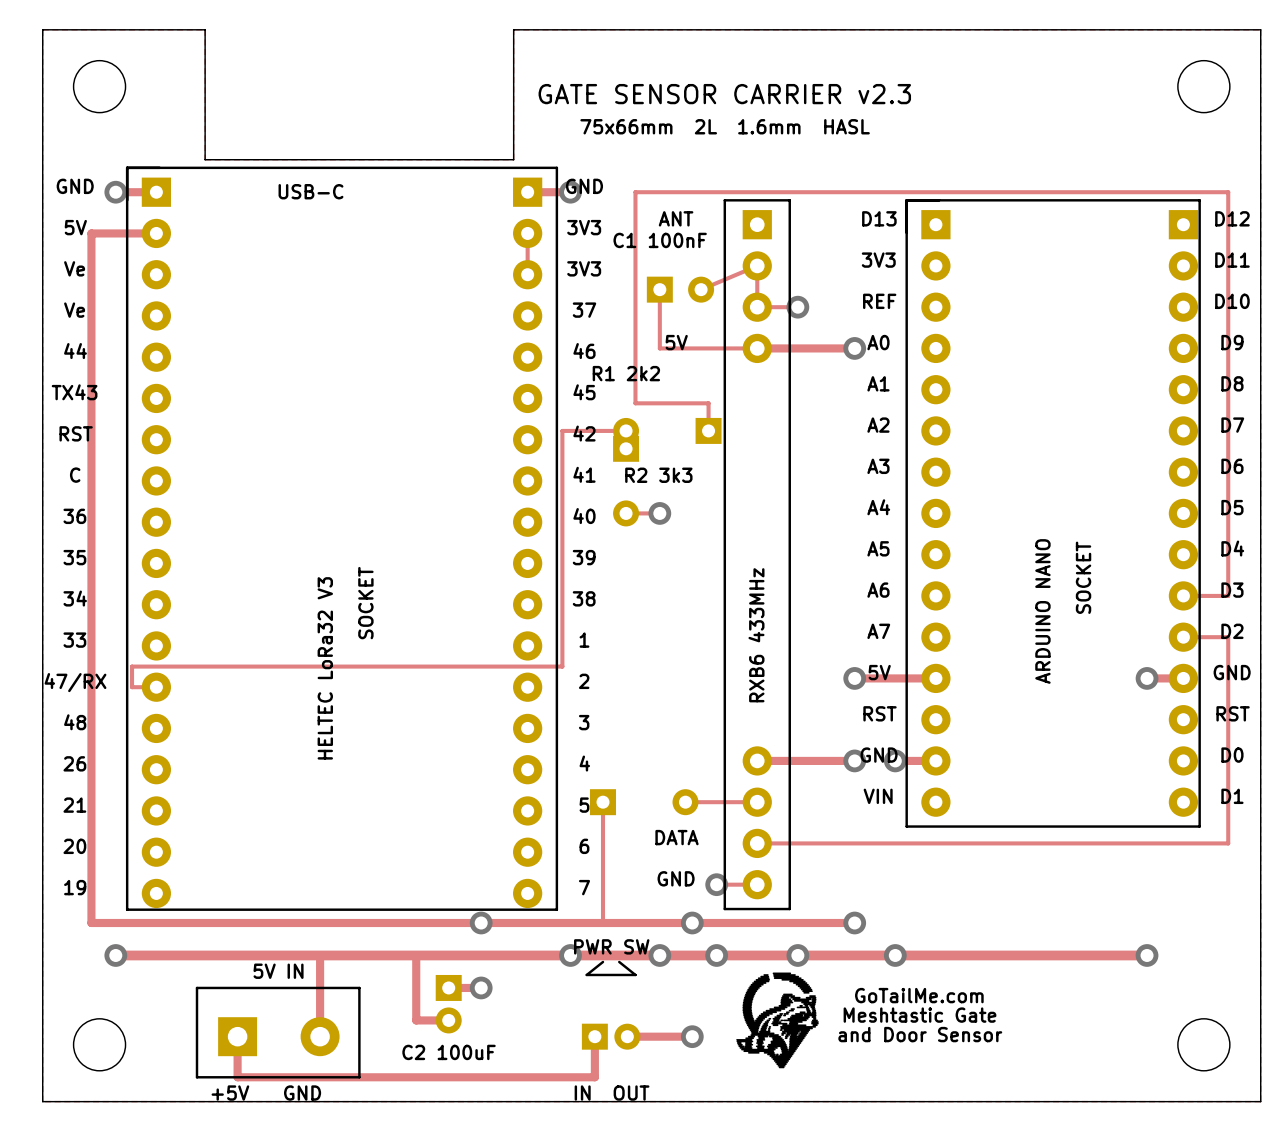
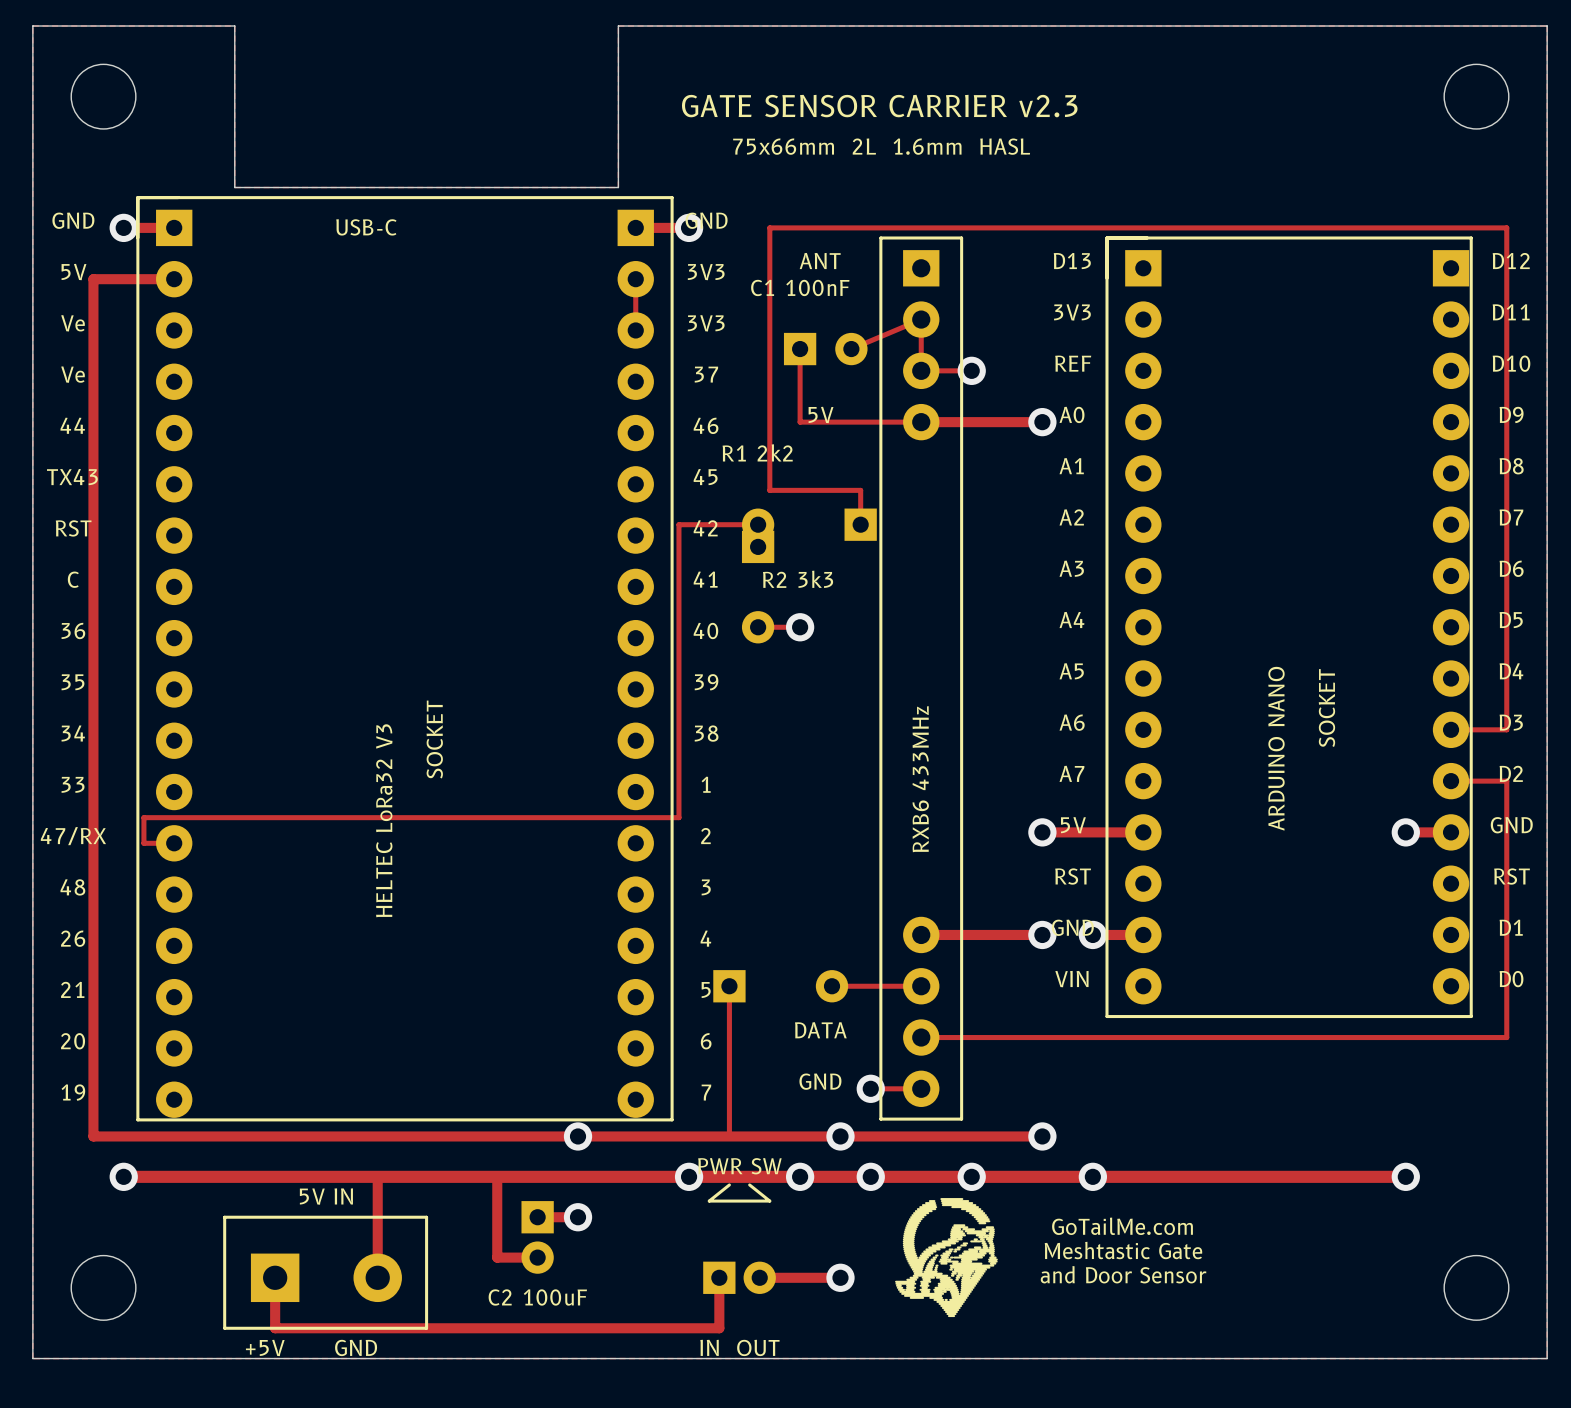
text: D0 (1232, 755) -> D1 (1511, 927)
text: D1 (1232, 796) -> D0 (1511, 979)

